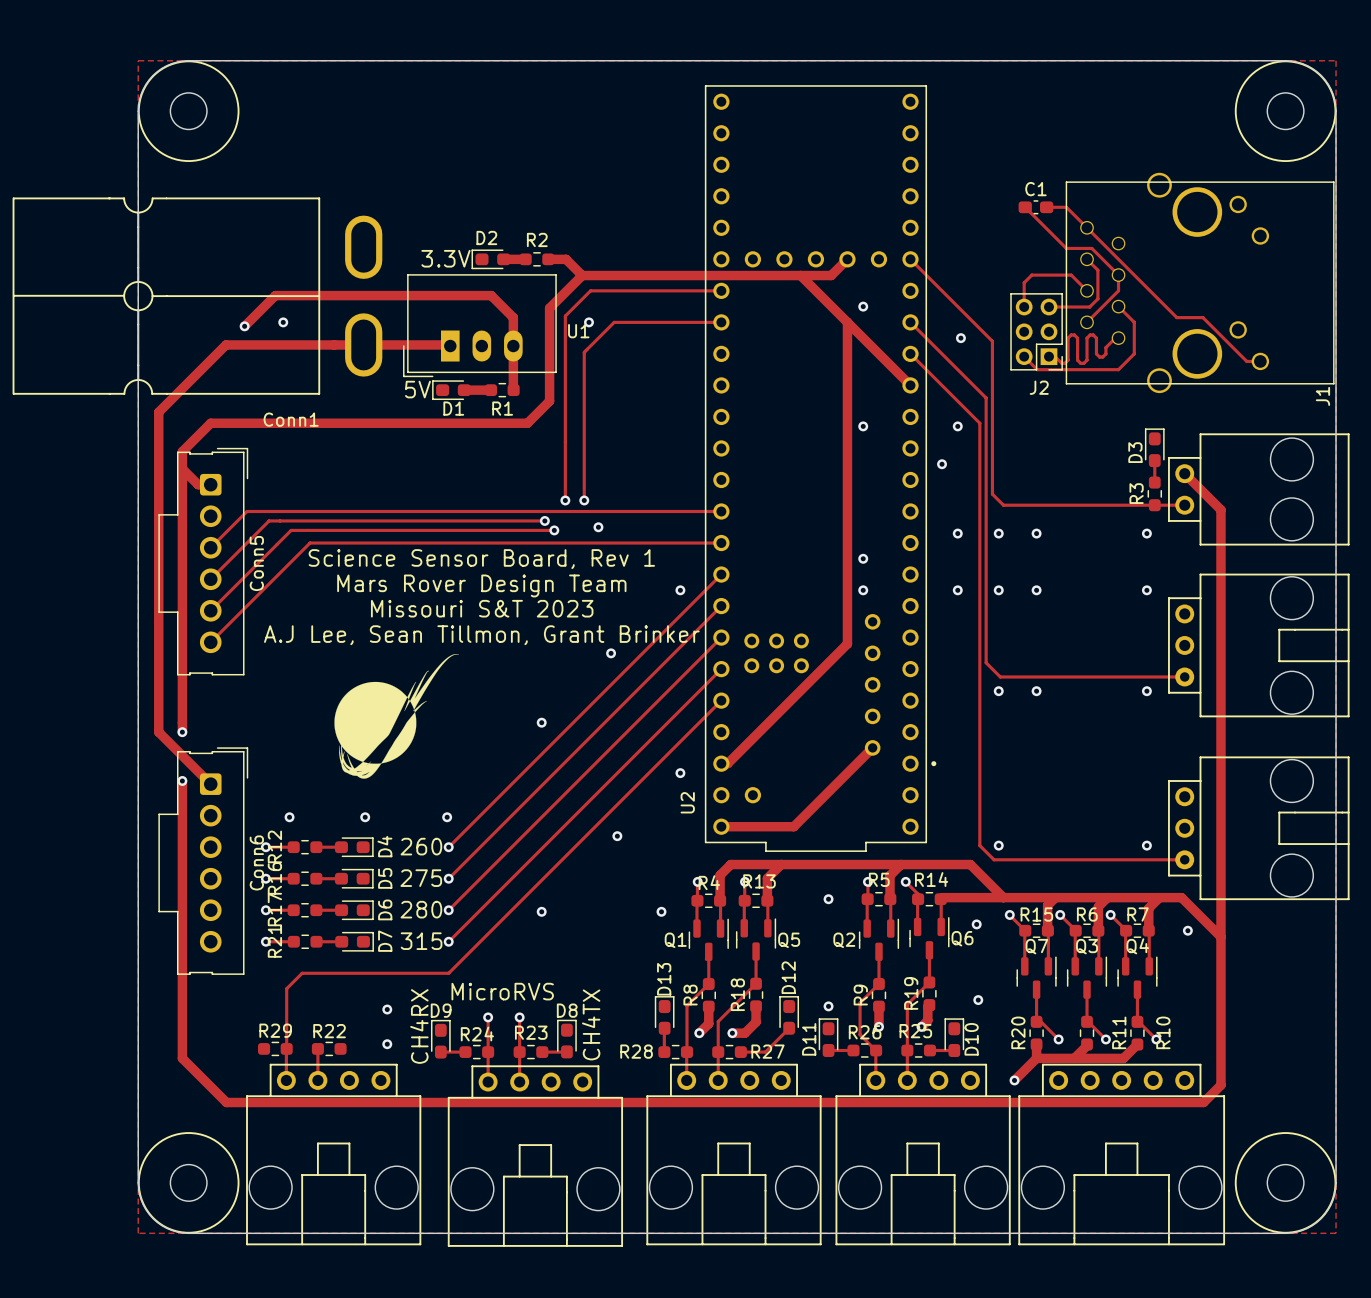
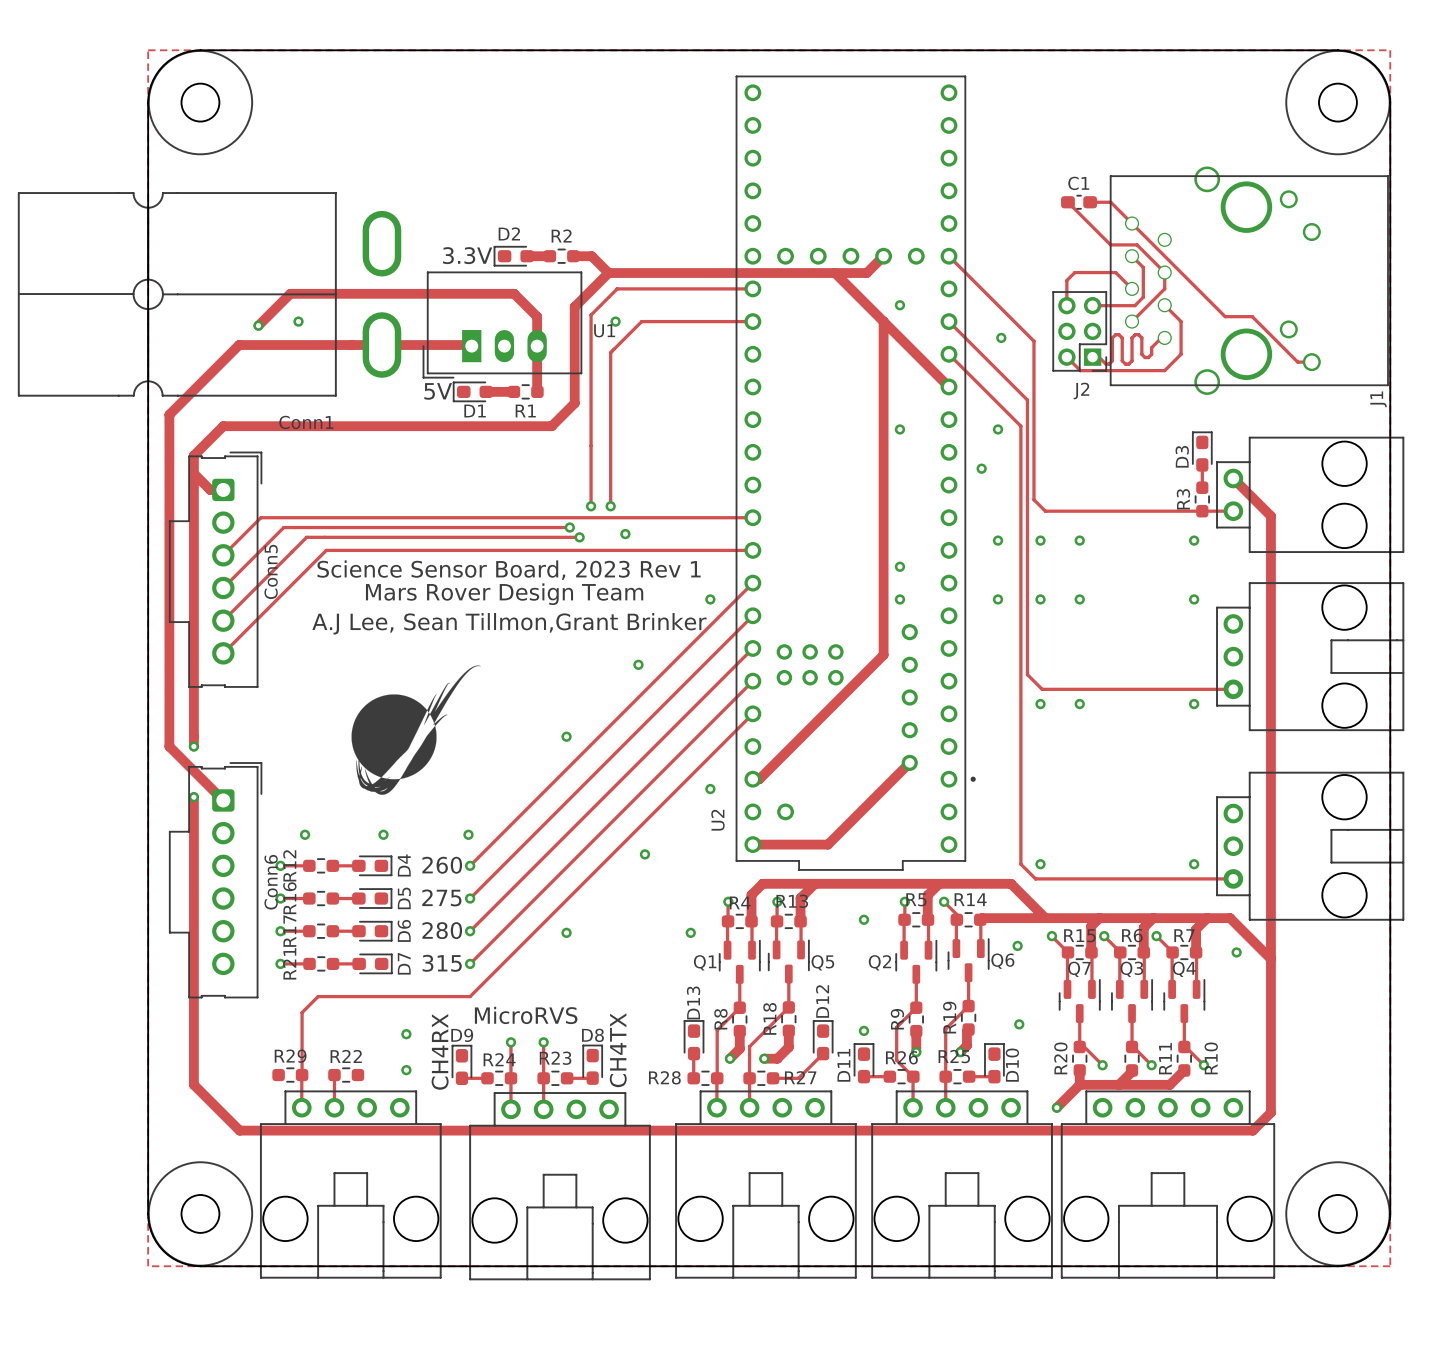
text: Science Sensor Board, Rev 1 (481, 559) -> Science Sensor Board, 2023 Rev 1 (509, 570)
text: Missouri S&T 2023 (482, 608) -> A.J Lee, Sean Tillmon,Grant Brinker (509, 623)
text: A.J Lee, Sean Tillmon, Grant Brinker (481, 635) -> none

